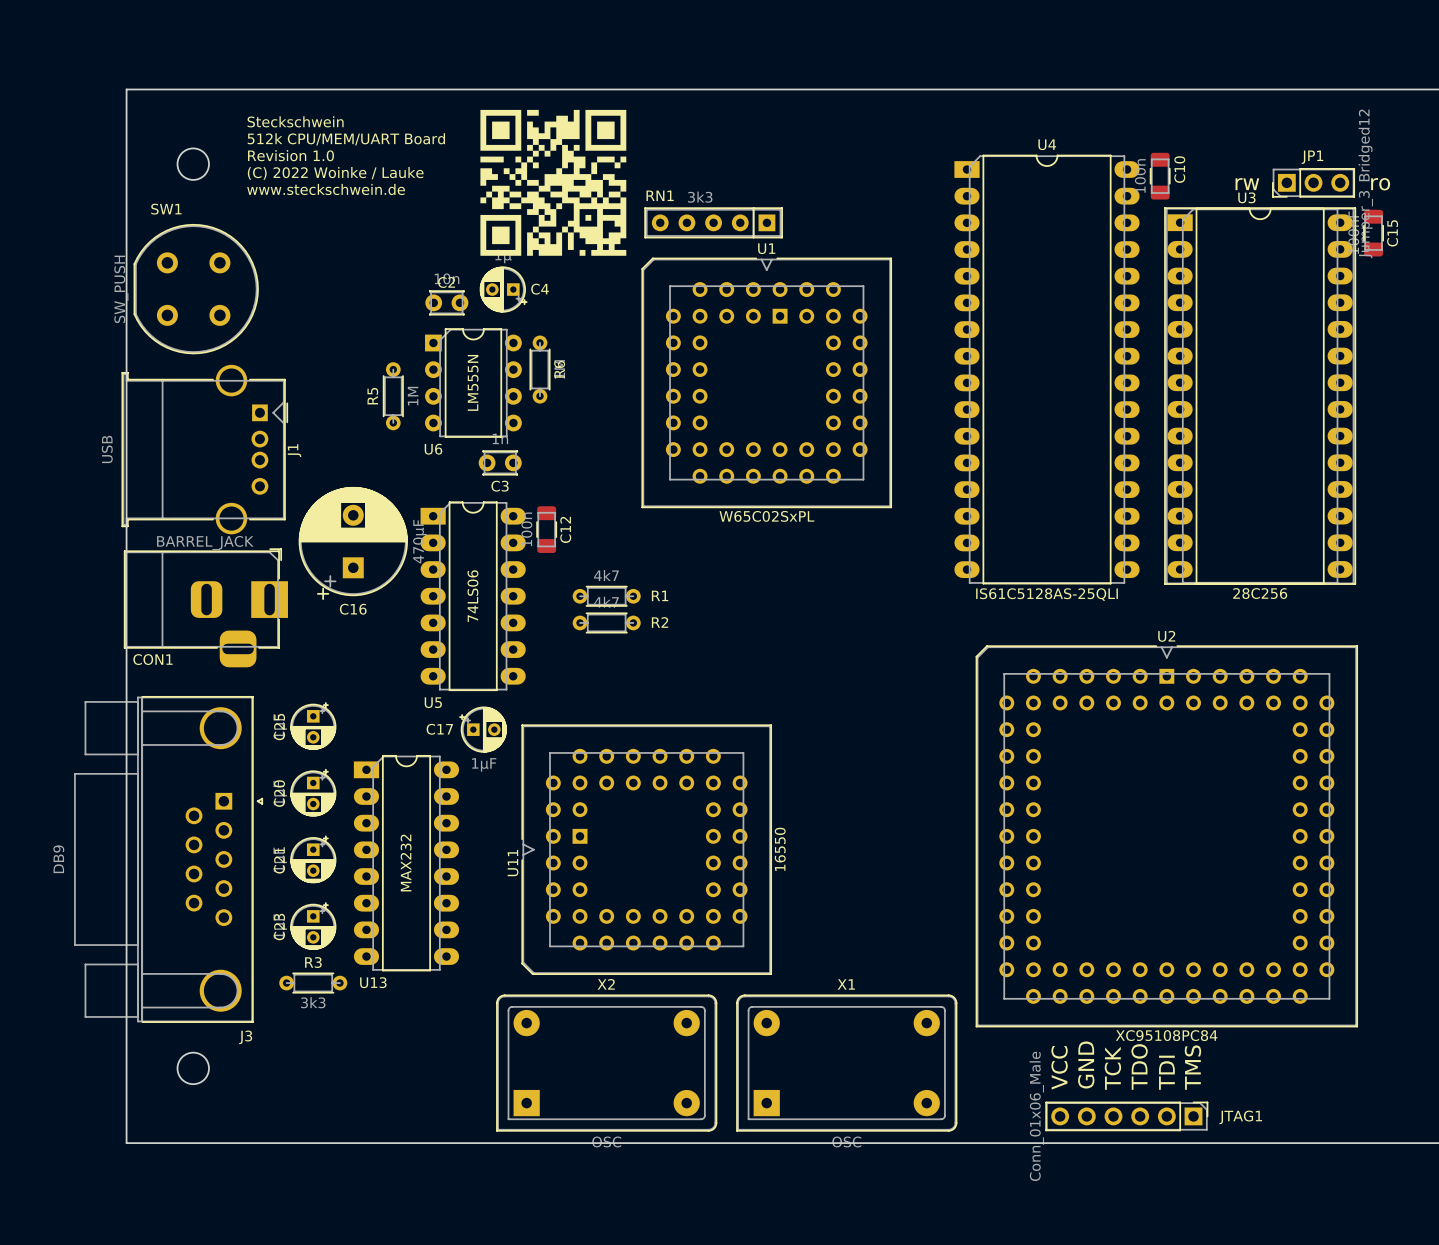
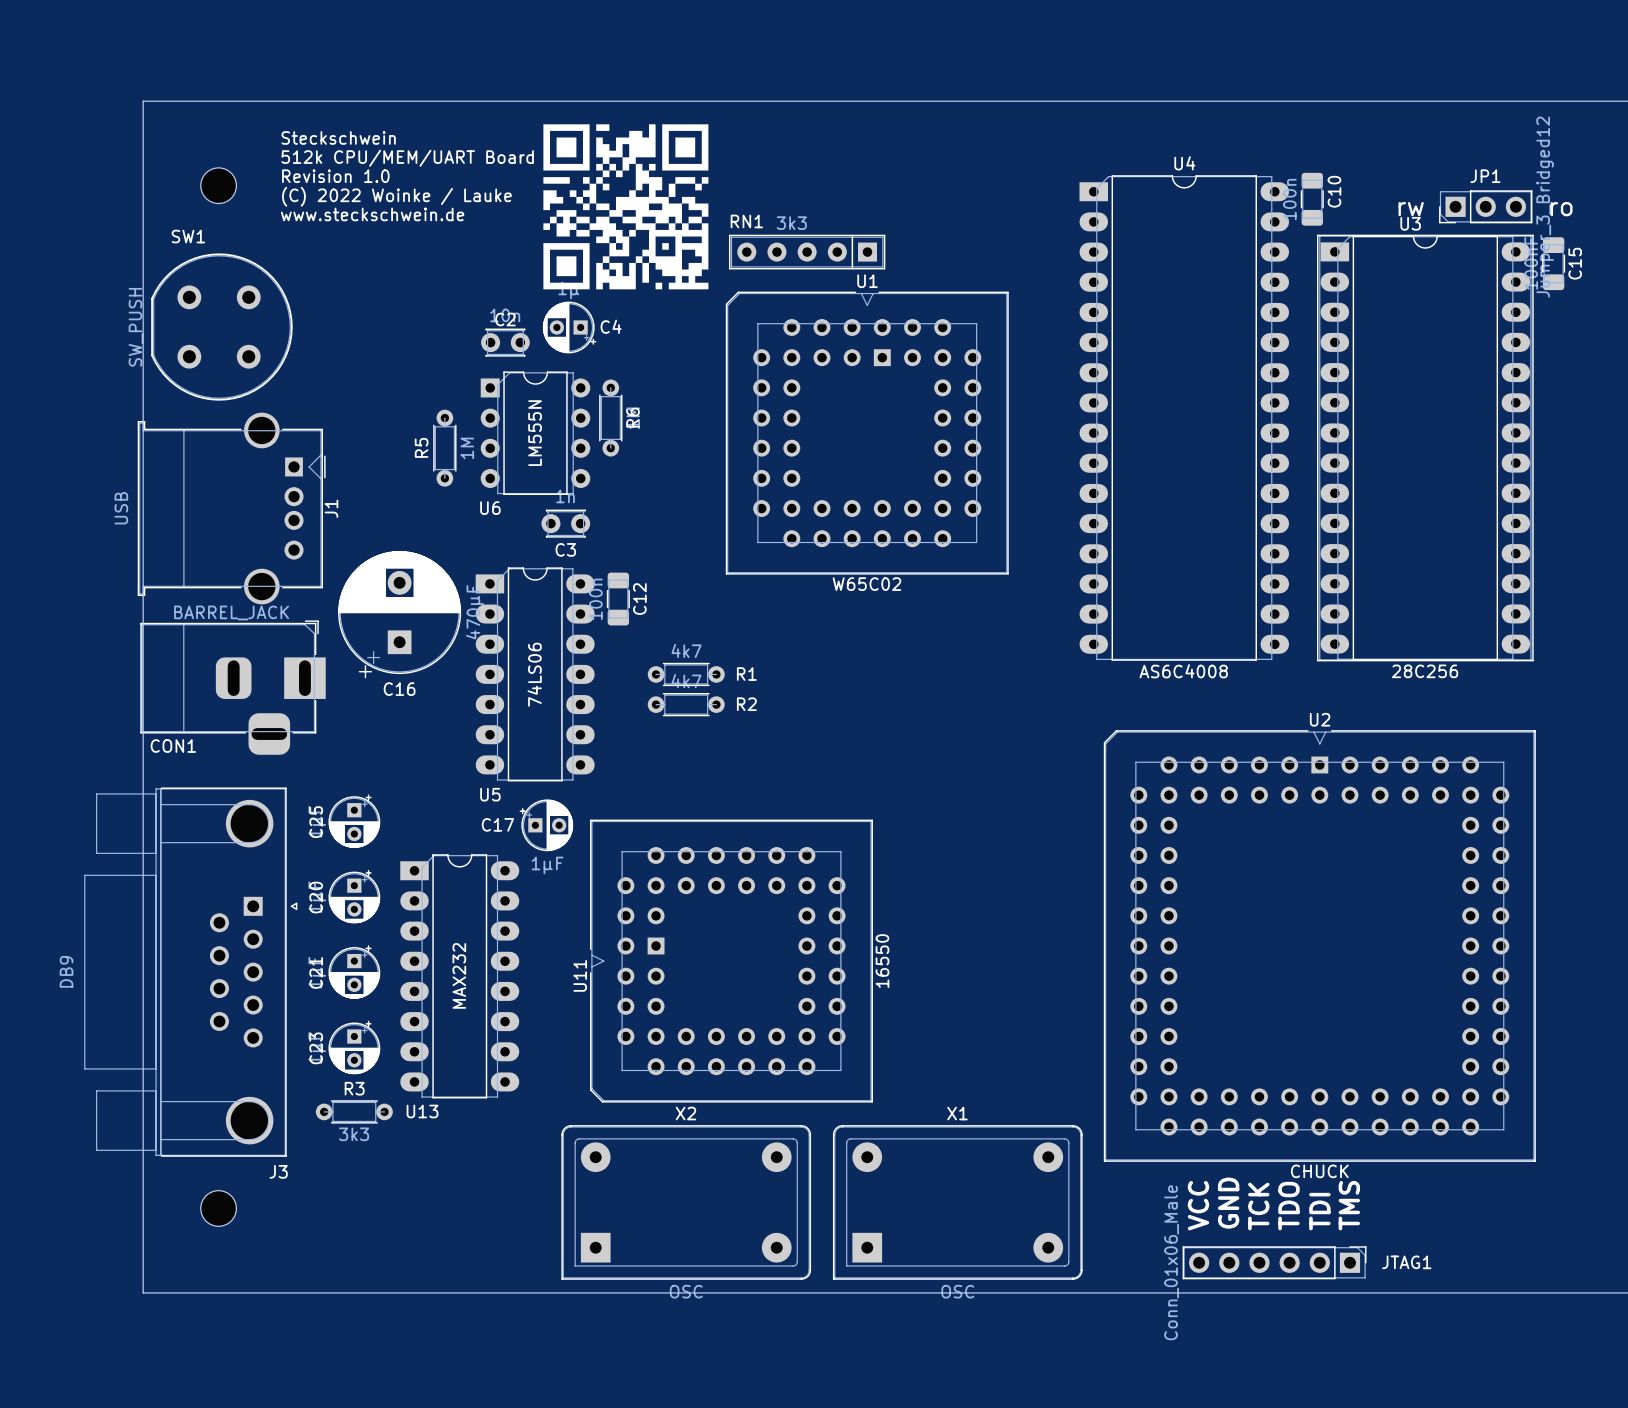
U1 value: W65C02SxPL (766, 516) -> W65C02 (866, 584)
U4 value: IS61C5128AS-25QLI (1047, 594) -> AS6C4008 (1183, 671)
U2 value: XC95108PC84 (1166, 1035) -> CHUCK (1319, 1171)

